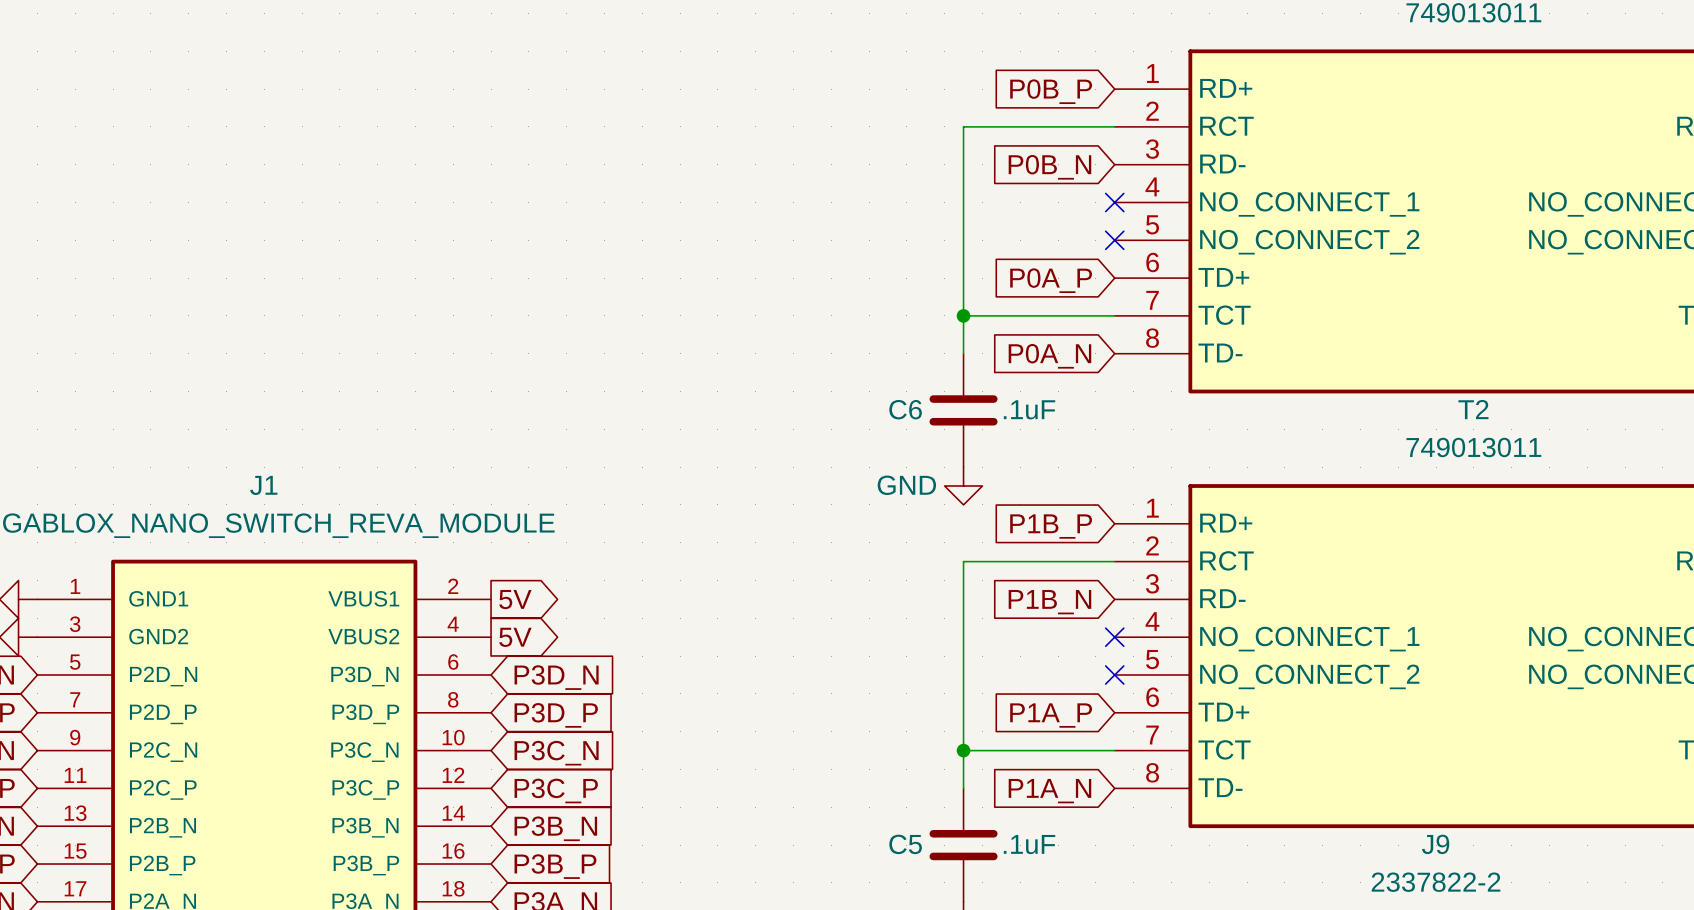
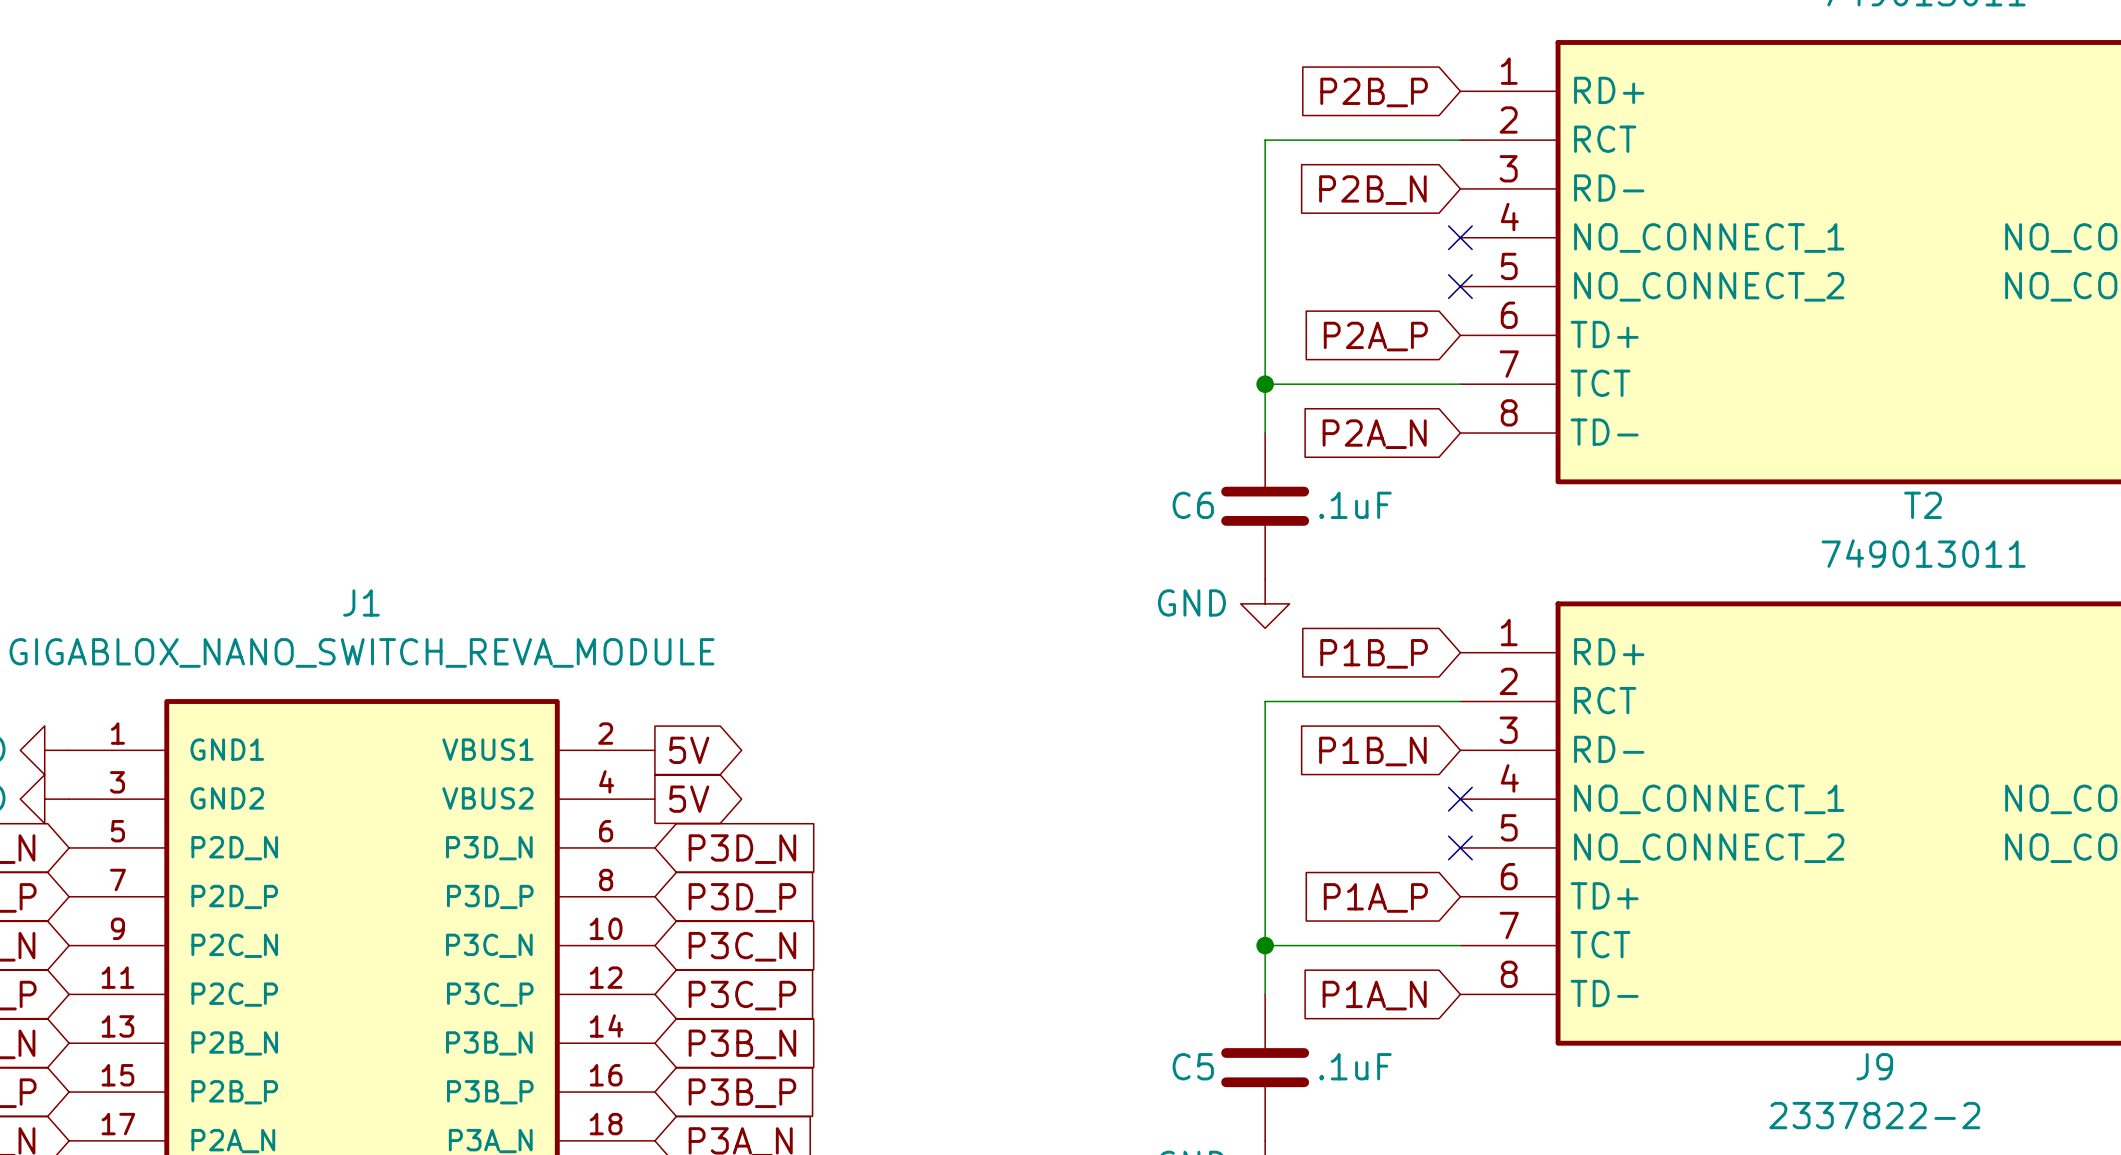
global label: P0B_P (1051, 91) -> P2B_P (1374, 92)
global label: P0B_N (1049, 167) -> P2B_N (1372, 190)
global label: P0A_P (1051, 280) -> P2A_P (1375, 336)
global label: P0A_N (1049, 356) -> P2A_N (1374, 434)

